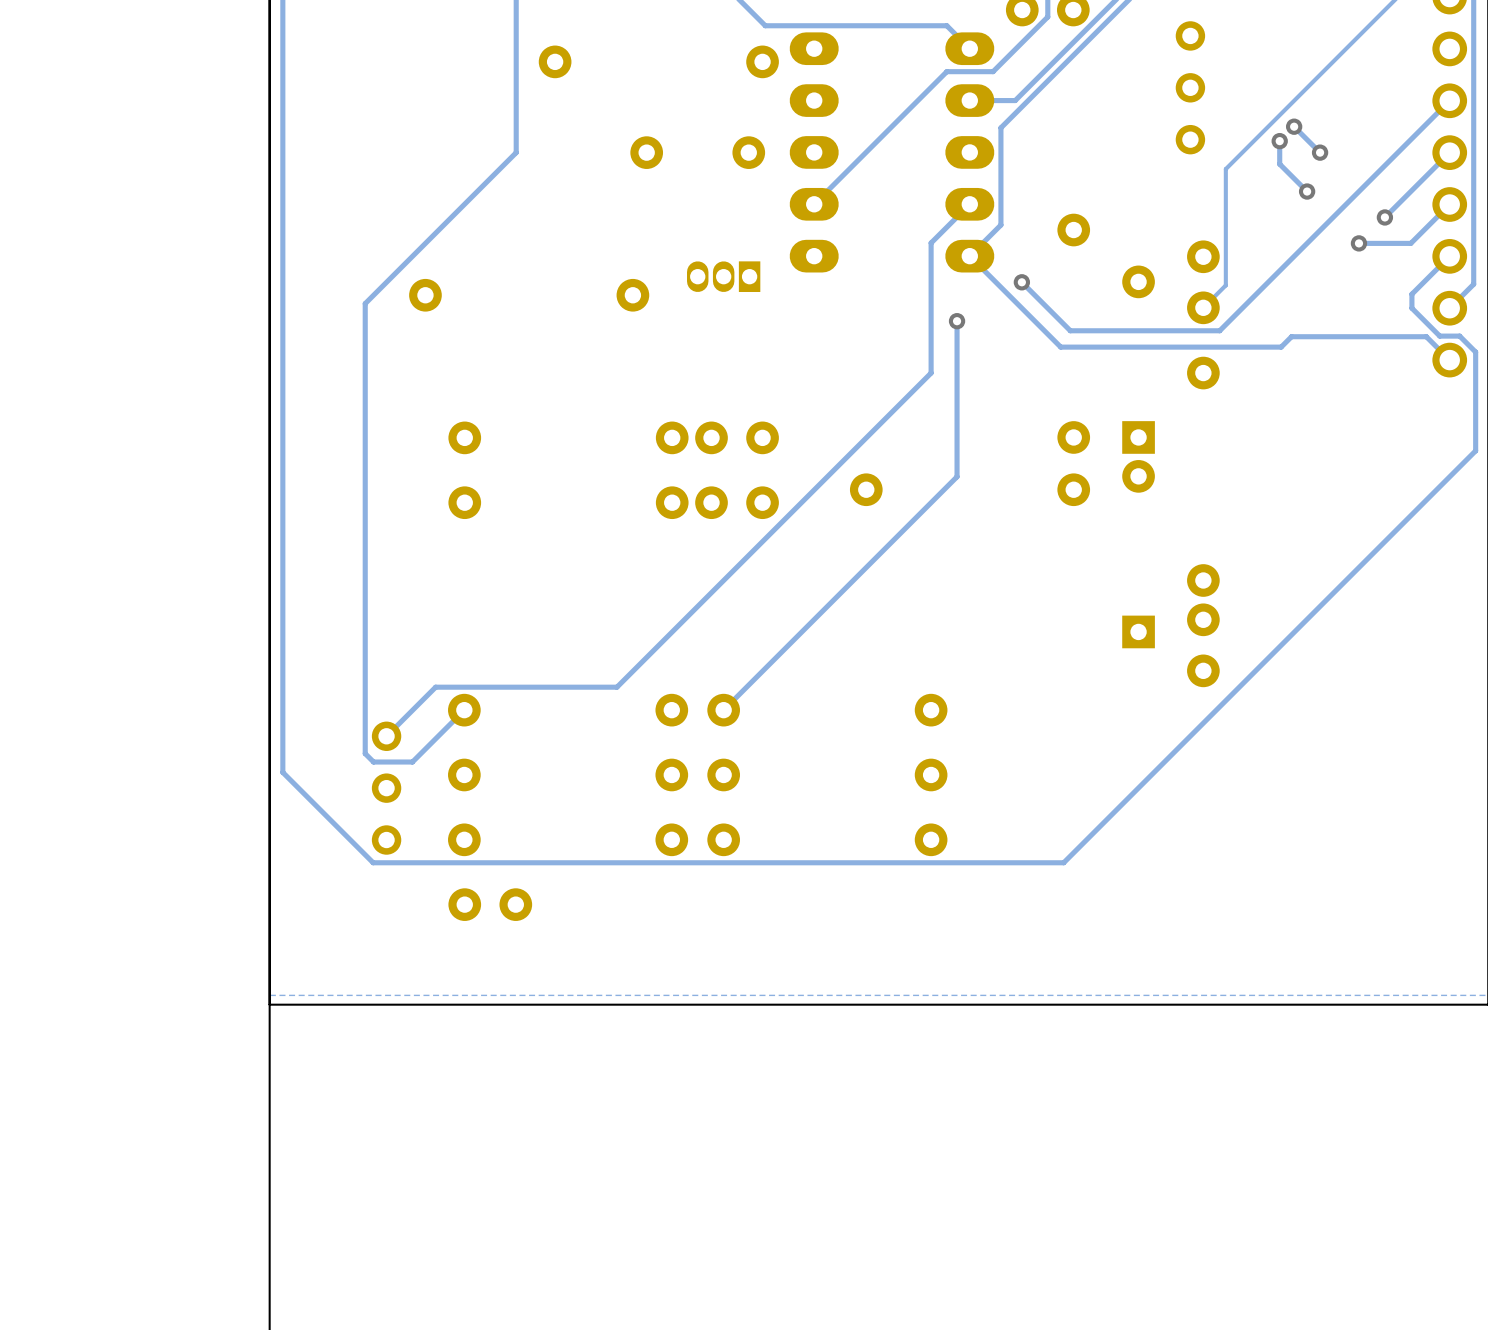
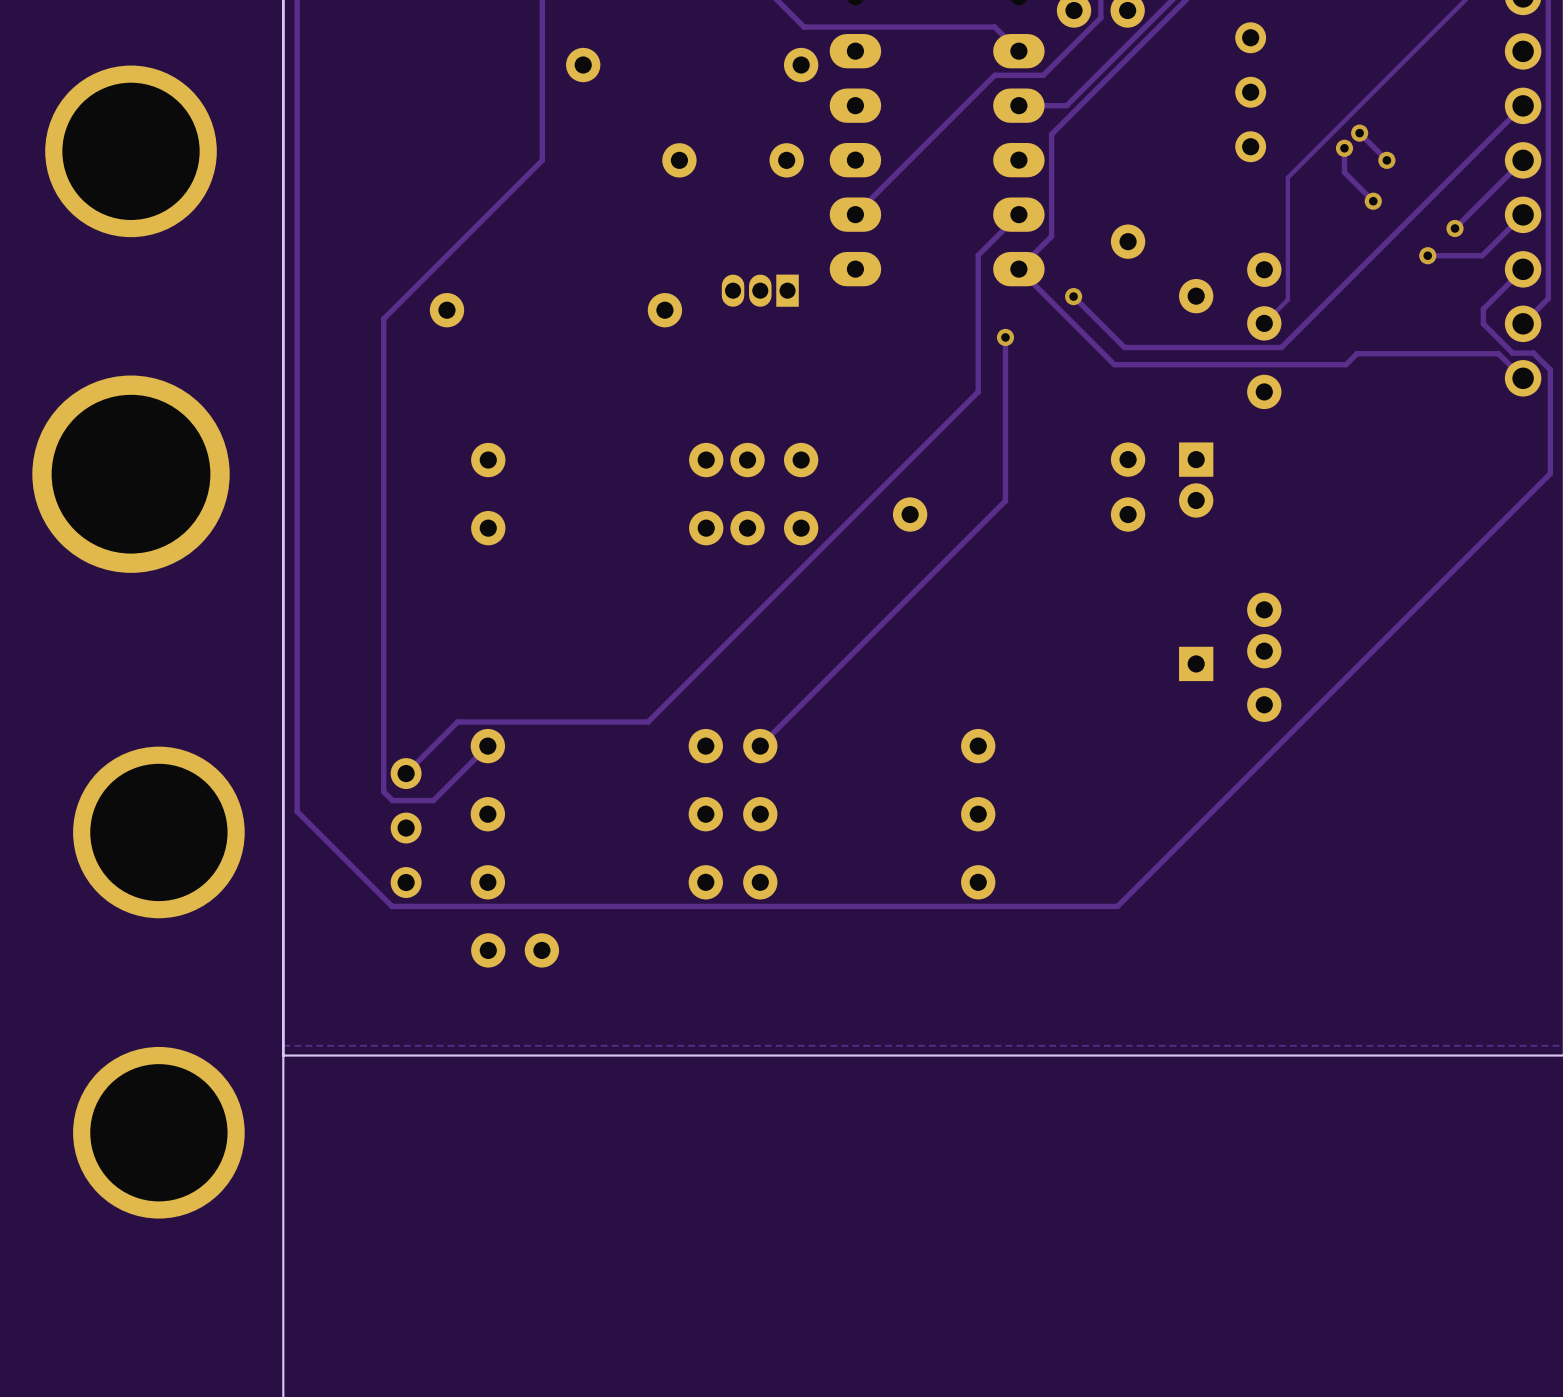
part: none -> (131, 151)
part: none -> (131, 474)
part: none -> (158, 832)
part: none -> (158, 1132)

